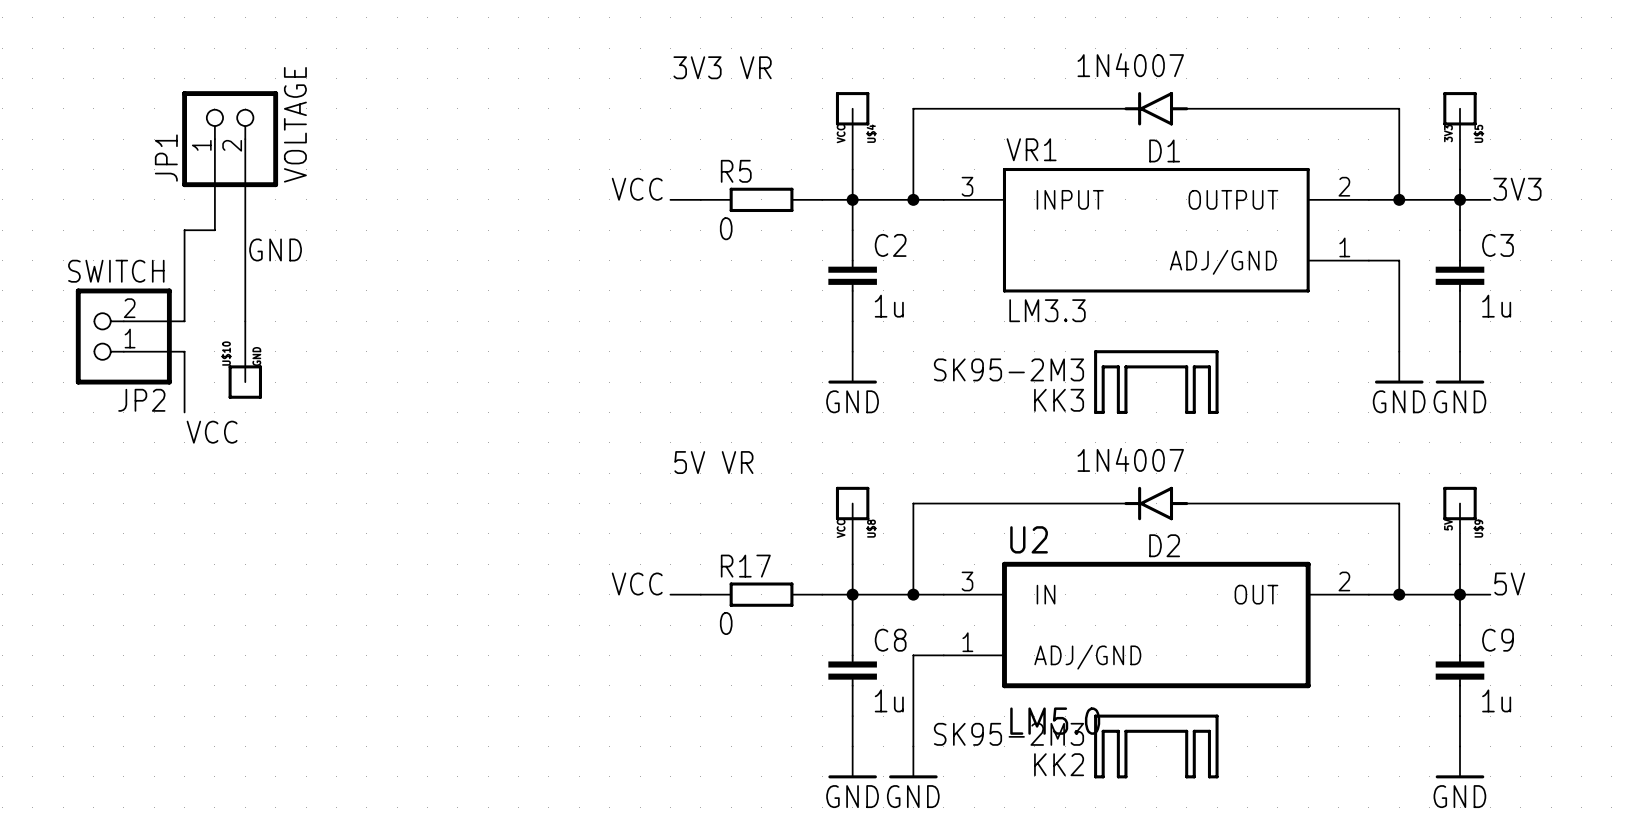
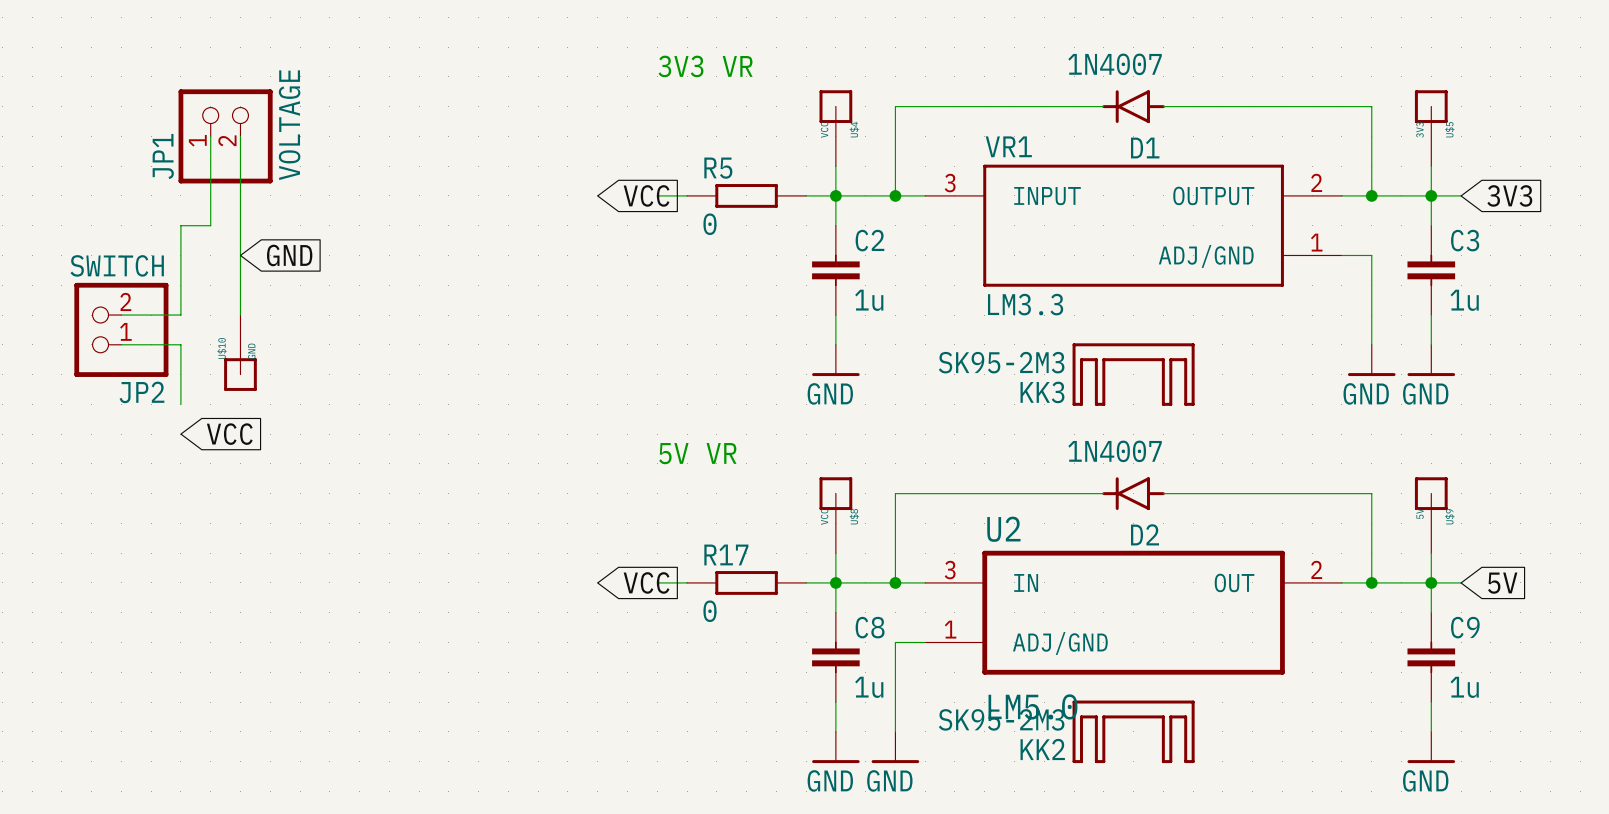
label: VCC (637, 189) -> none
label: 3V3 (1517, 189) -> none
global label: none -> VCC (646, 195)
global label: none -> 3V3 (1509, 195)
label: GND (275, 249) -> none
global label: none -> GND (289, 255)
label: VCC (212, 432) -> none
global label: none -> VCC (229, 434)
label: VCC (637, 584) -> none
label: 5V (1509, 584) -> none
global label: none -> VCC (646, 582)
global label: none -> 5V (1502, 583)

